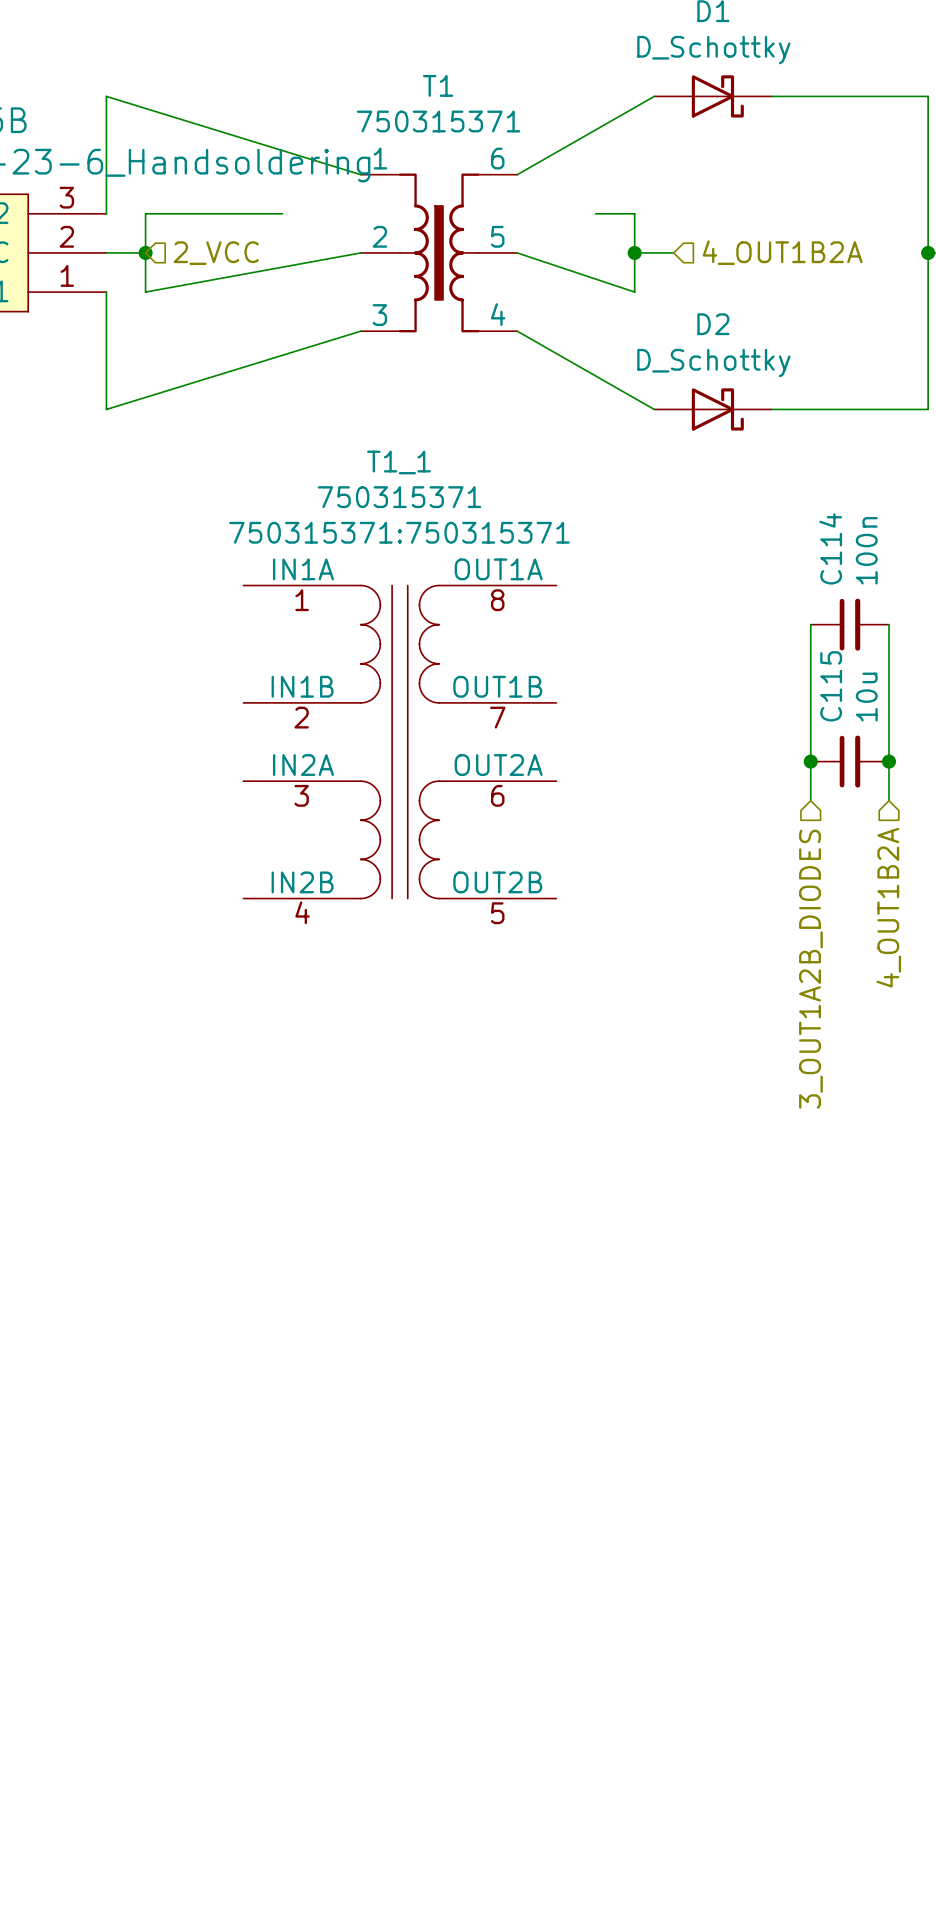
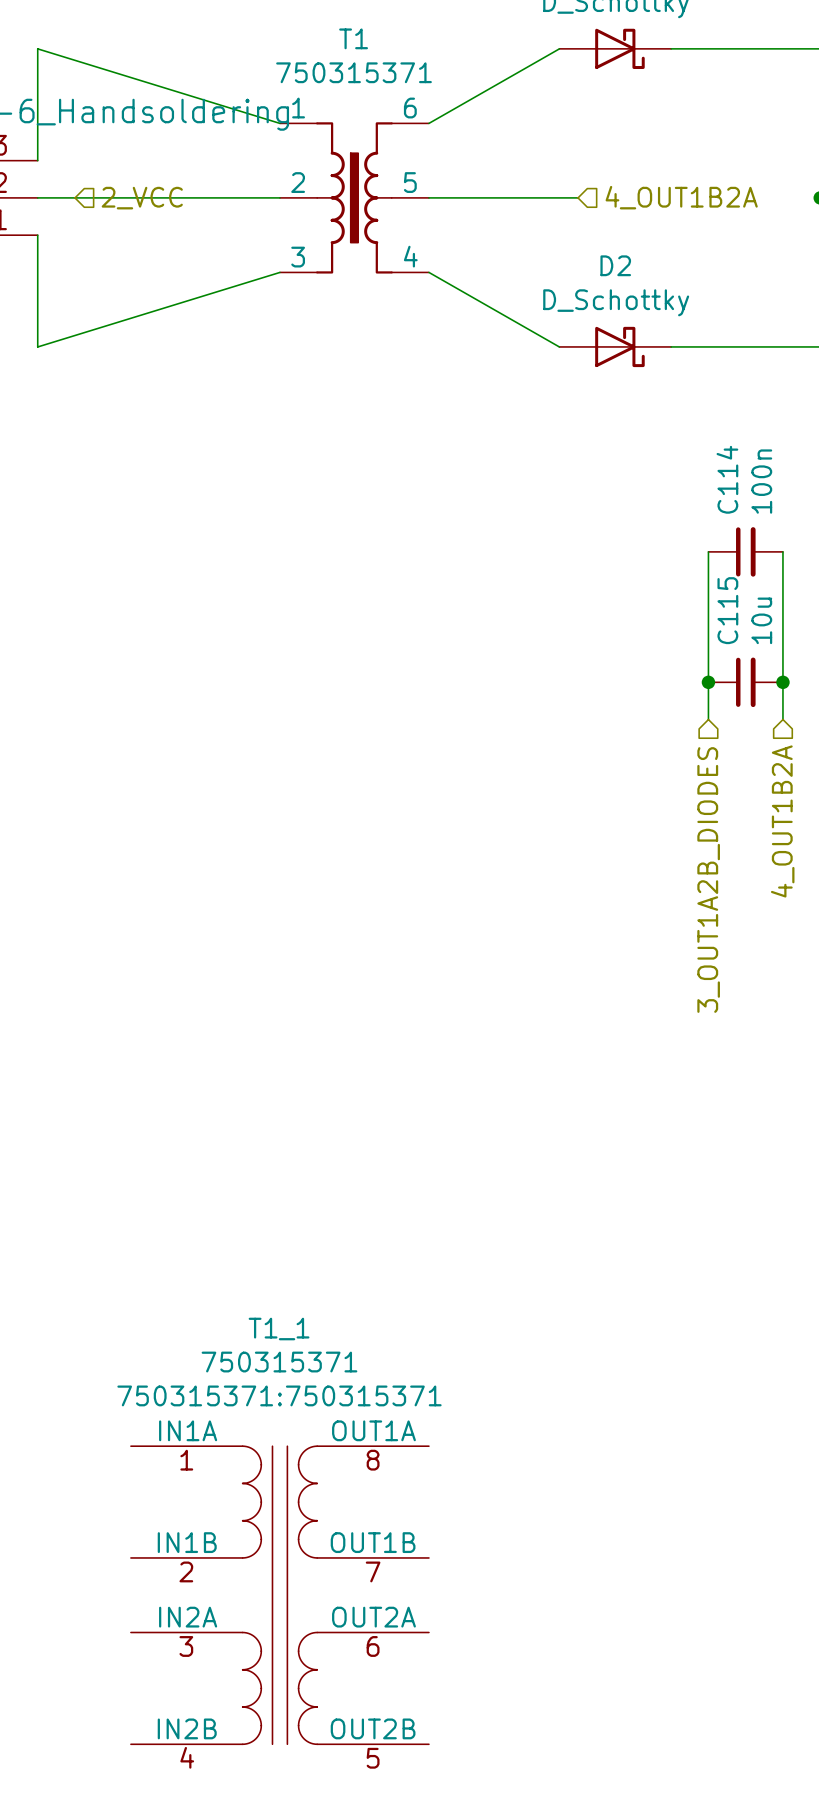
wire: (282, 213) (145, 213) (145, 292) (360, 252) -> (74, 197) (279, 197)
wire: (595, 213) (634, 213) (634, 292) (517, 252) -> (540, 197) (428, 197)
junction: (145, 252) -> none
junction: (634, 252) -> none
T1_1 position: (399, 742) -> (279, 1595)

